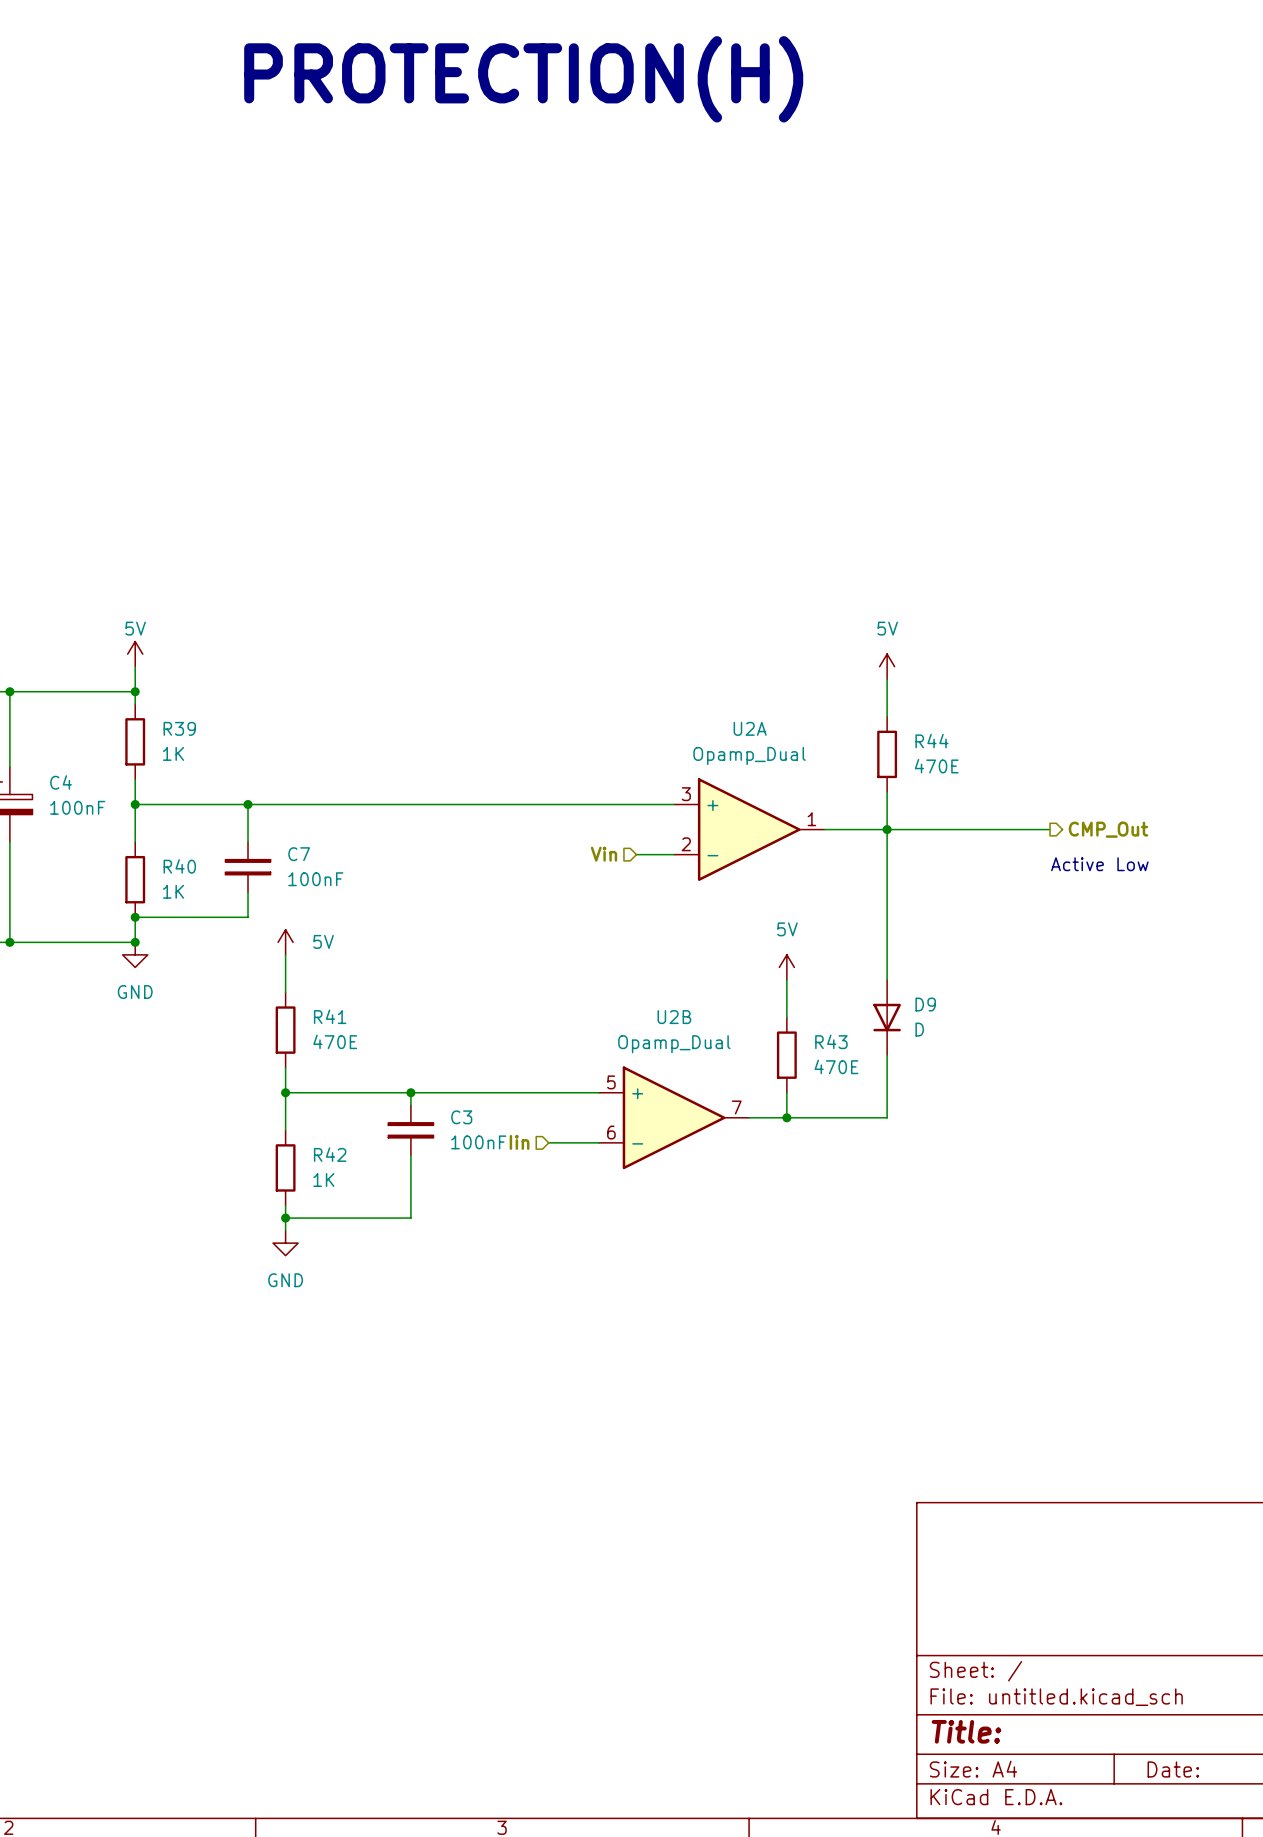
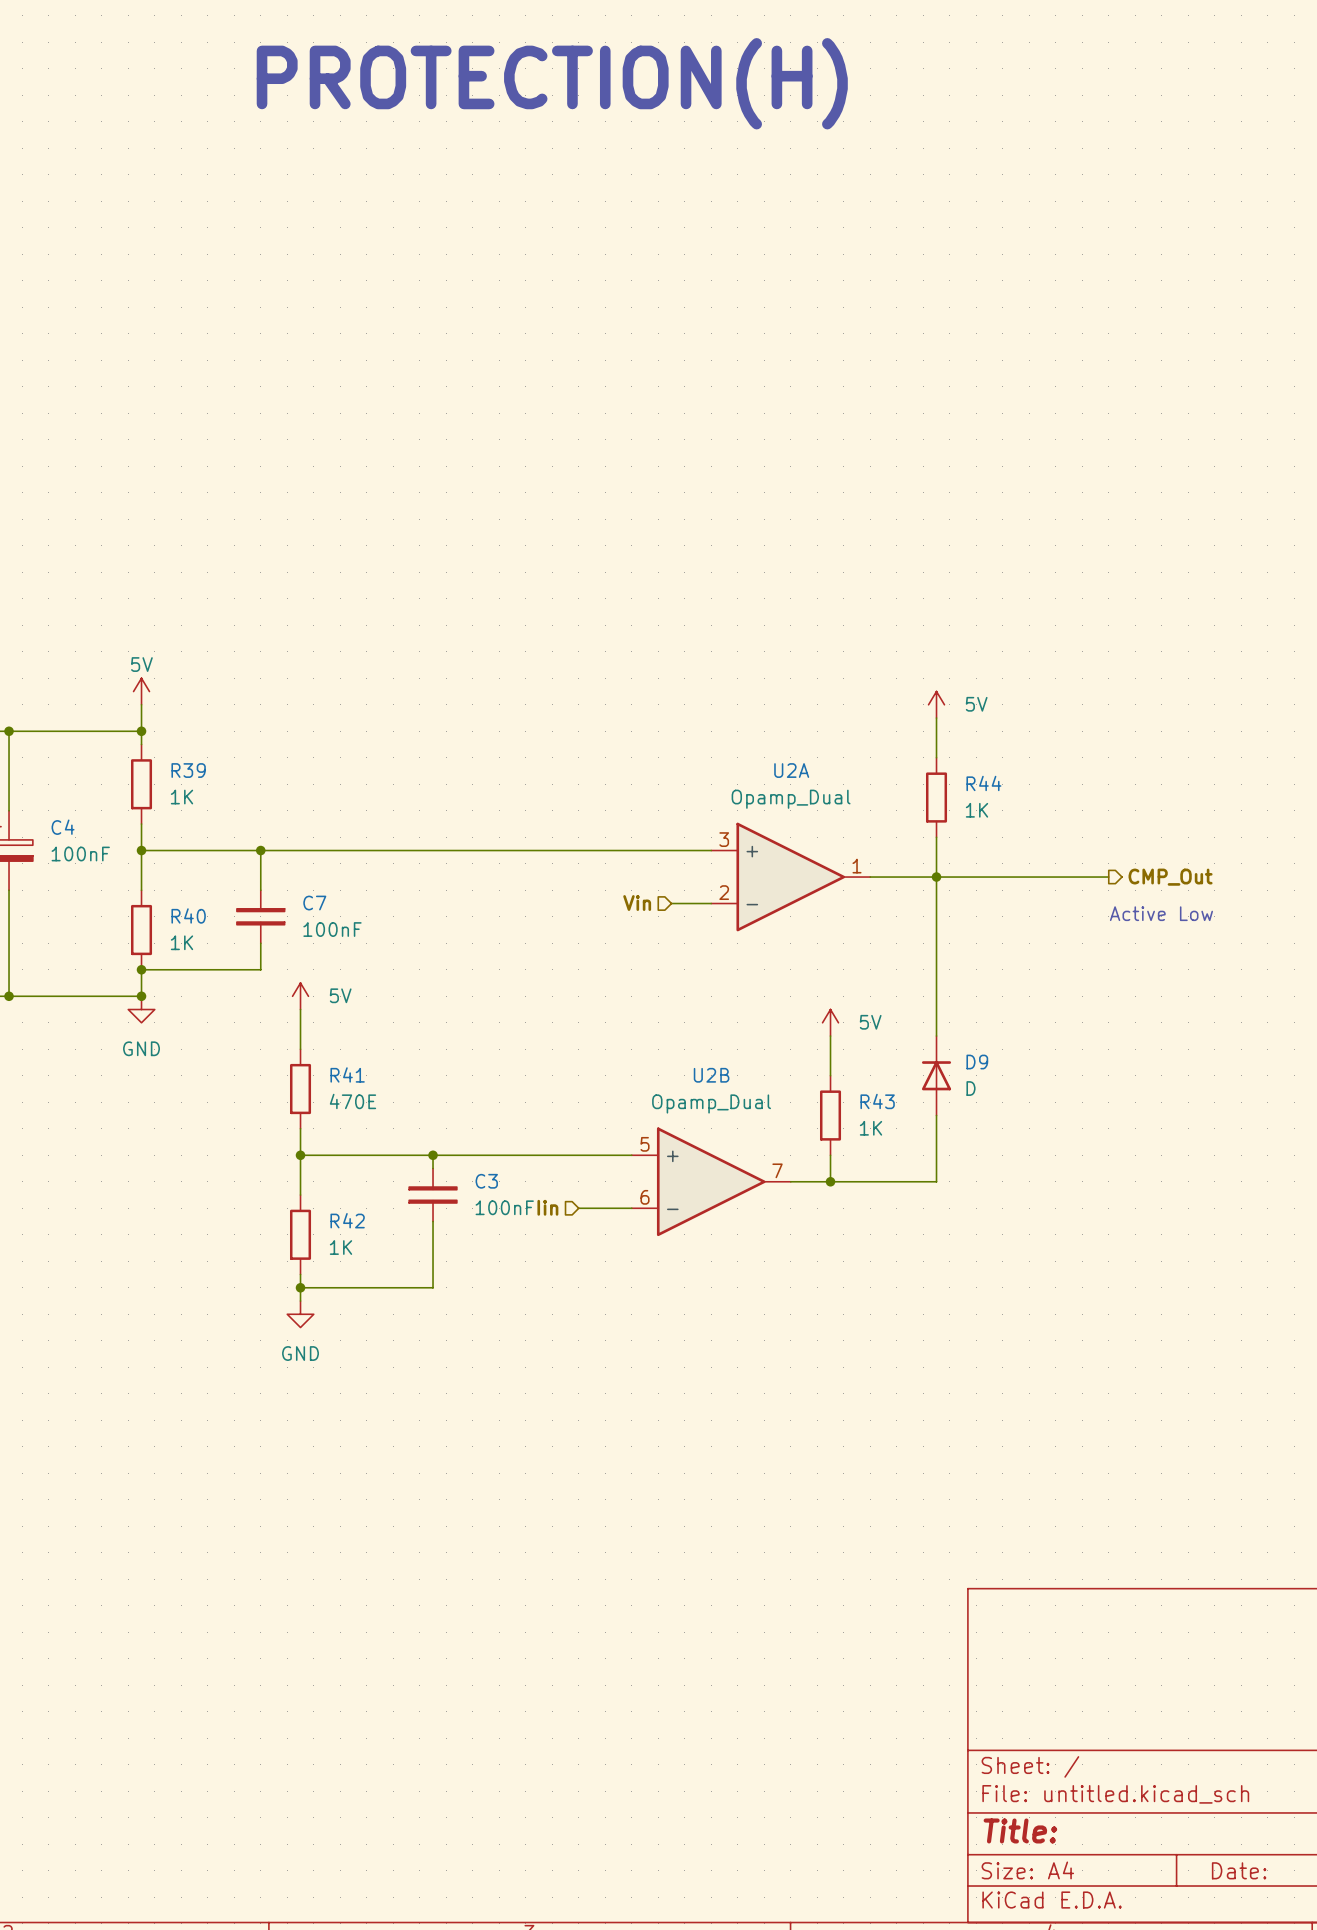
power symbol text position: 5V (887, 628) -> 5V (976, 704)
R44 value: 470E (936, 766) -> 1K (976, 810)
power symbol text position: 5V (787, 929) -> 5V (870, 1022)
D9 rotation: 0° (887, 1017) -> 180° (936, 1075)
R43 value: 470E (836, 1066) -> 1K (870, 1128)

